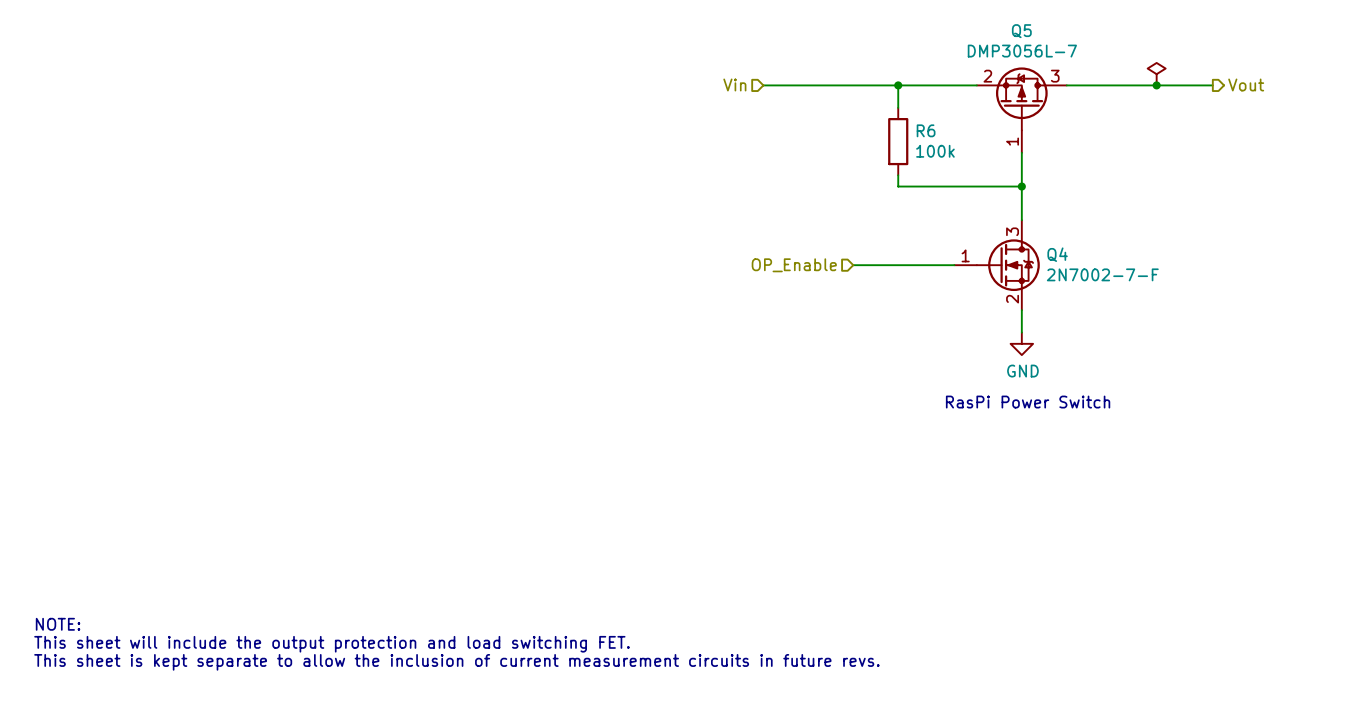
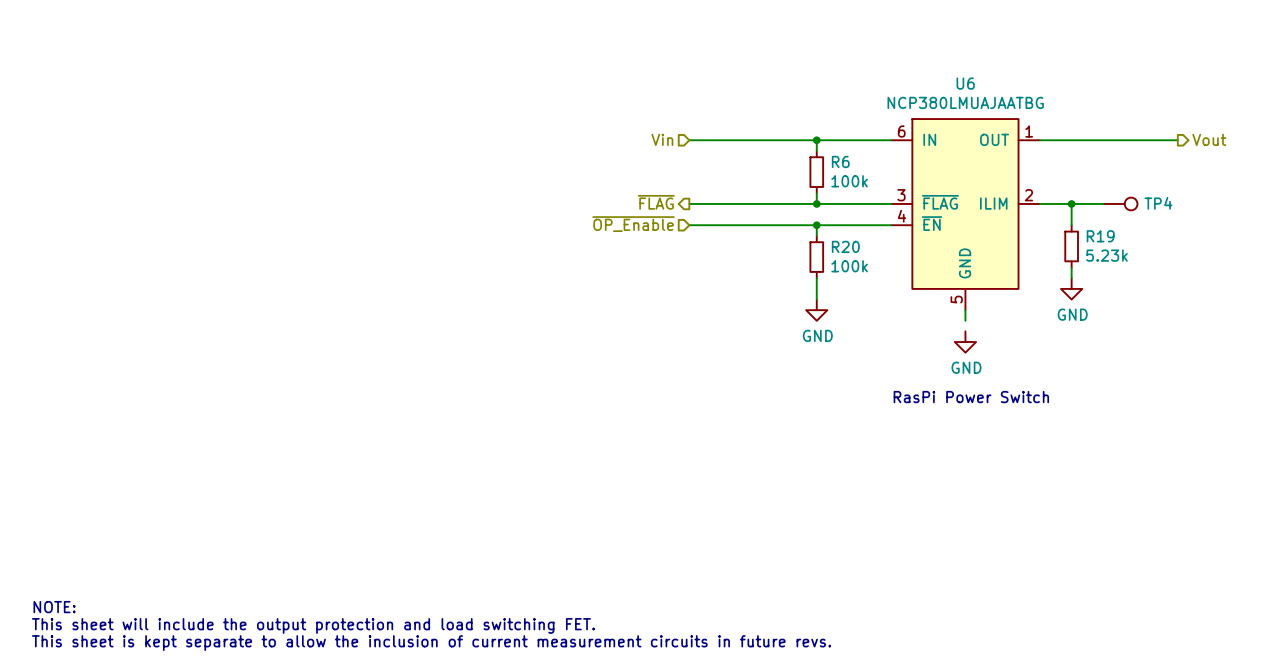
power symbol: (1156, 74) -> none
hierarchical label position: Vin (734, 84) -> Vin (662, 139)
hierarchical label position: Vout (1246, 84) -> Vout (1209, 139)
wire: (763, 85) (976, 85) -> (689, 140) (891, 140)
wire: (898, 85) (898, 107) -> (816, 278) (816, 299)
junction: (898, 85) -> none
wire: (1066, 85) (1212, 85) -> (1039, 140) (1177, 140)
junction: (1156, 85) -> none
R6 symbol: [888, 107, 909, 176] -> [809, 150, 824, 194]
Q5: (1021, 110) -> none
wire: none -> (816, 140) (816, 150)
junction: none -> (816, 140)
wire: (898, 175) (898, 186) (1021, 186) -> none
wire: none -> (816, 193) (816, 203)
junction: (1021, 186) -> none
hierarchical label: none -> ~{FLAG} (656, 202)
wire: none -> (689, 203) (891, 203)
junction: none -> (816, 203)
wire: none -> (1039, 203) (1103, 203)
wire: none -> (1071, 203) (1071, 225)
junction: none -> (1071, 203)
TP4: none -> (1120, 203)
U6: none -> NCP380LMUAJAATBG (965, 214)
hierarchical label: none -> ~{OP_Enable} (633, 224)
wire: none -> (689, 225) (891, 225)
wire: none -> (816, 225) (816, 235)
junction: none -> (816, 225)
R19: none -> 5.23k (1071, 246)
R20: none -> 100k (816, 257)
hierarchical label: OP_Enable (794, 265) -> none
wire: (853, 265) (954, 265) -> none
Q4: 2N7002-7-F (997, 265) -> none
power symbol: none -> GND (1071, 288)
power symbol: none -> GND (816, 310)
wire: (1021, 321) (1021, 332) -> (1071, 267) (1071, 278)

